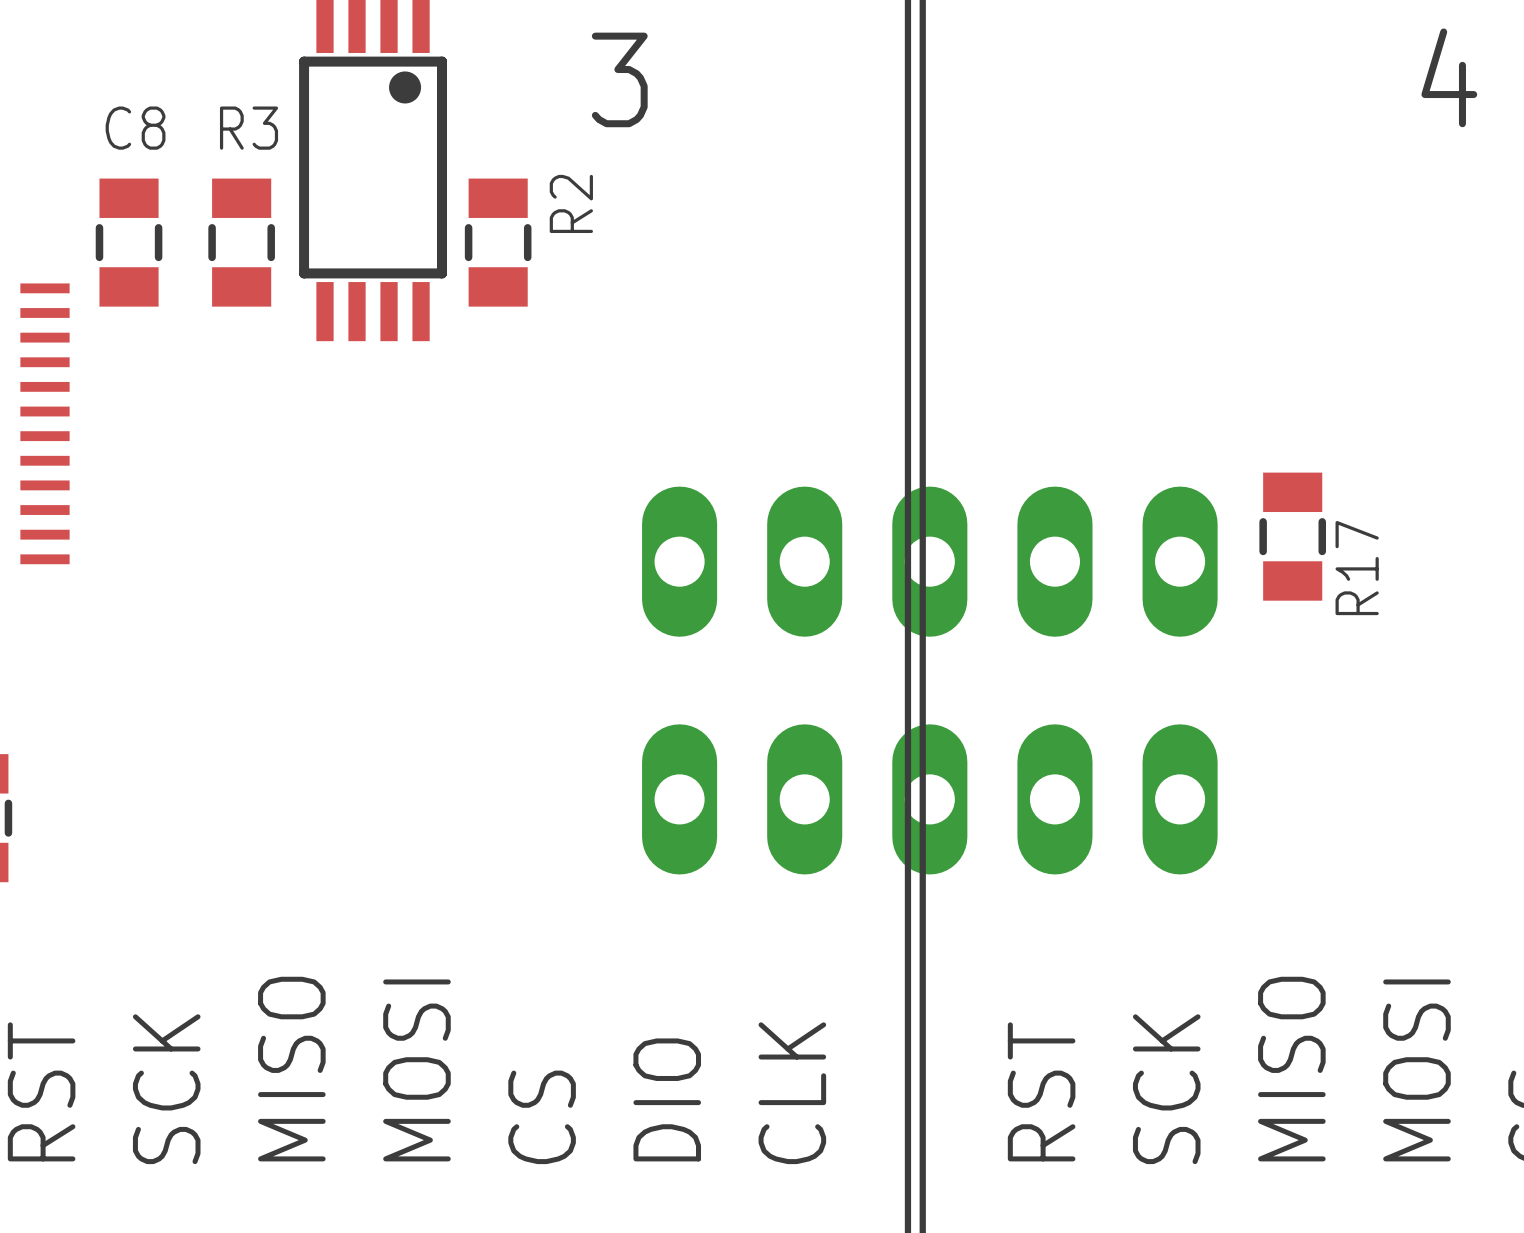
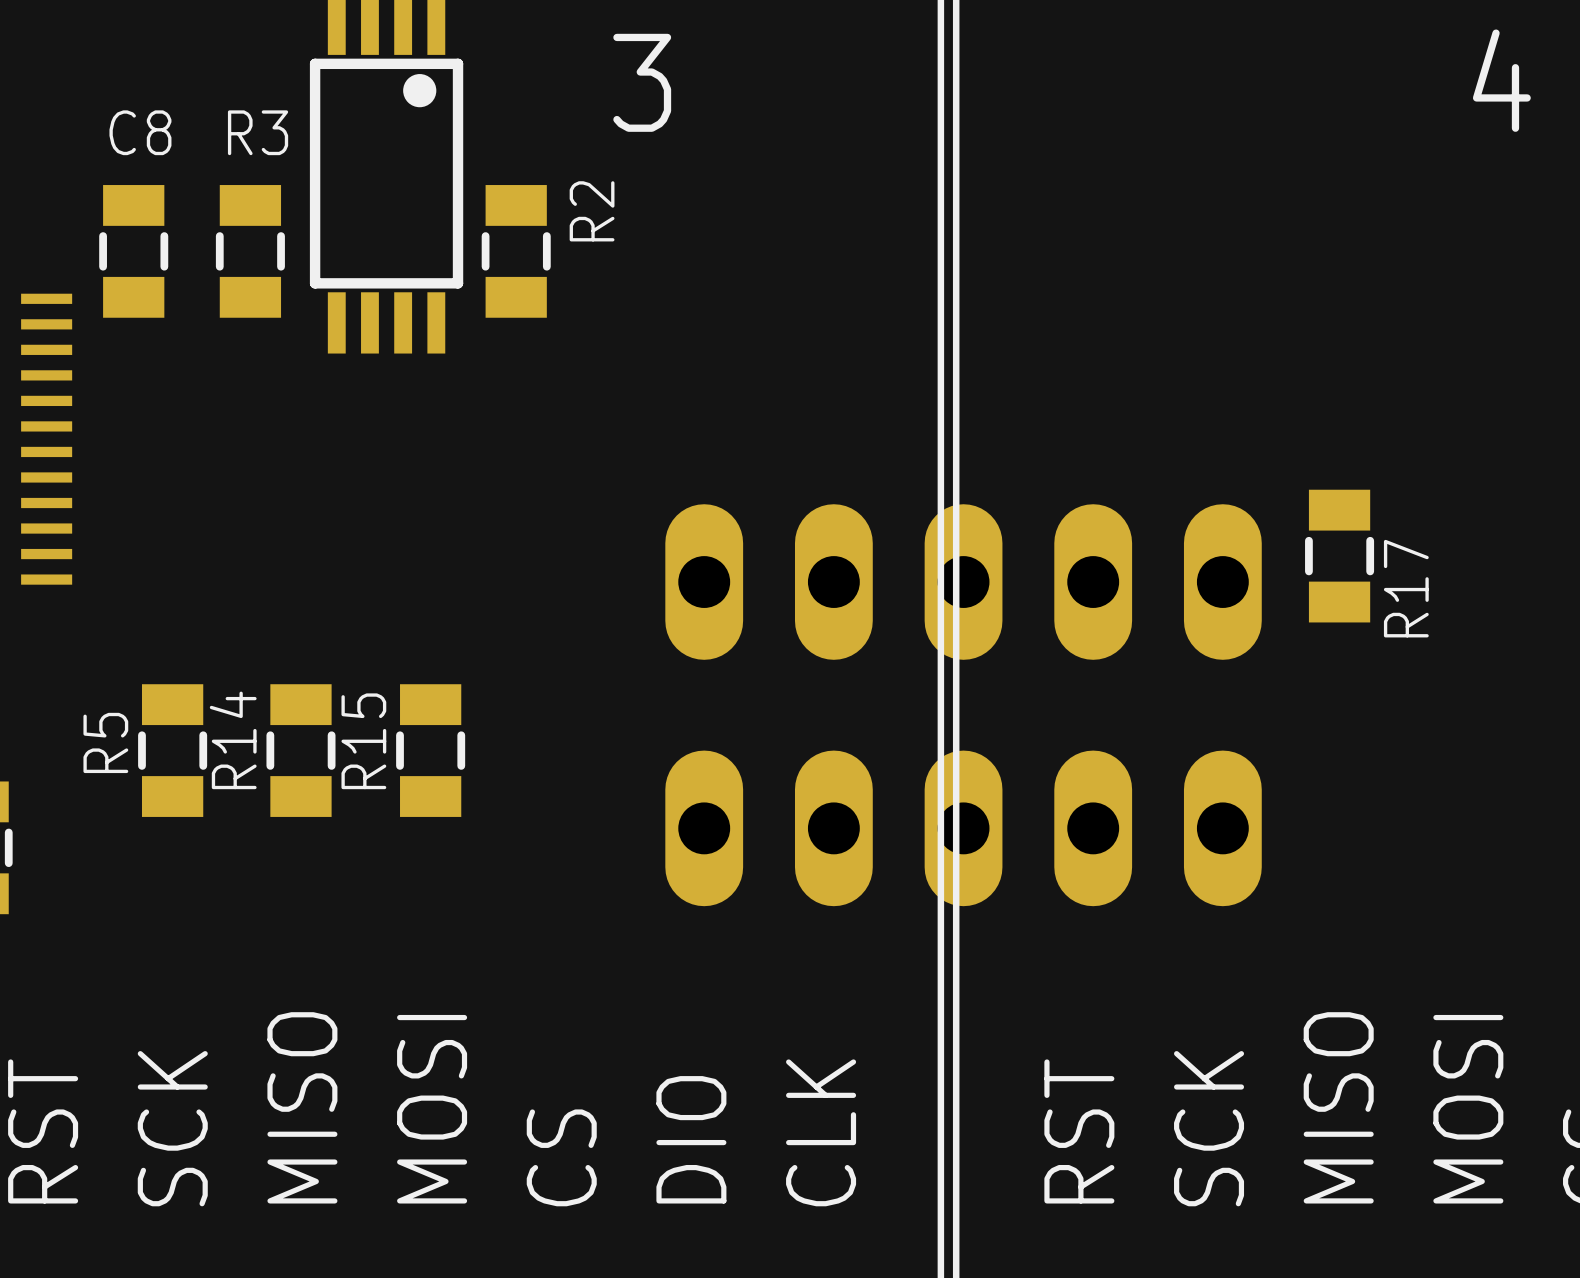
R5: none -> (172, 750)
R14: none -> (300, 750)
R15: none -> (430, 750)

